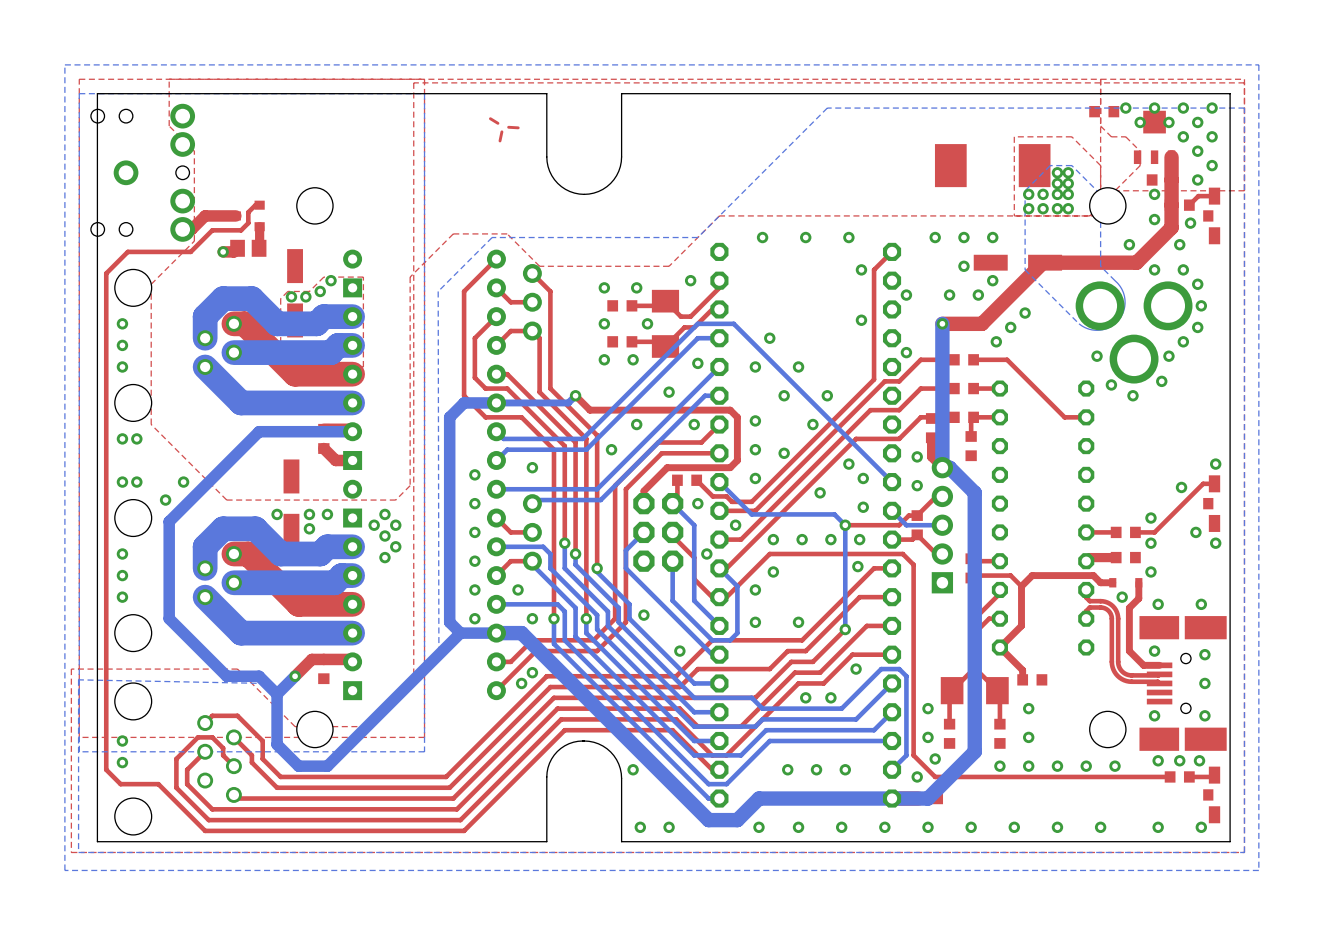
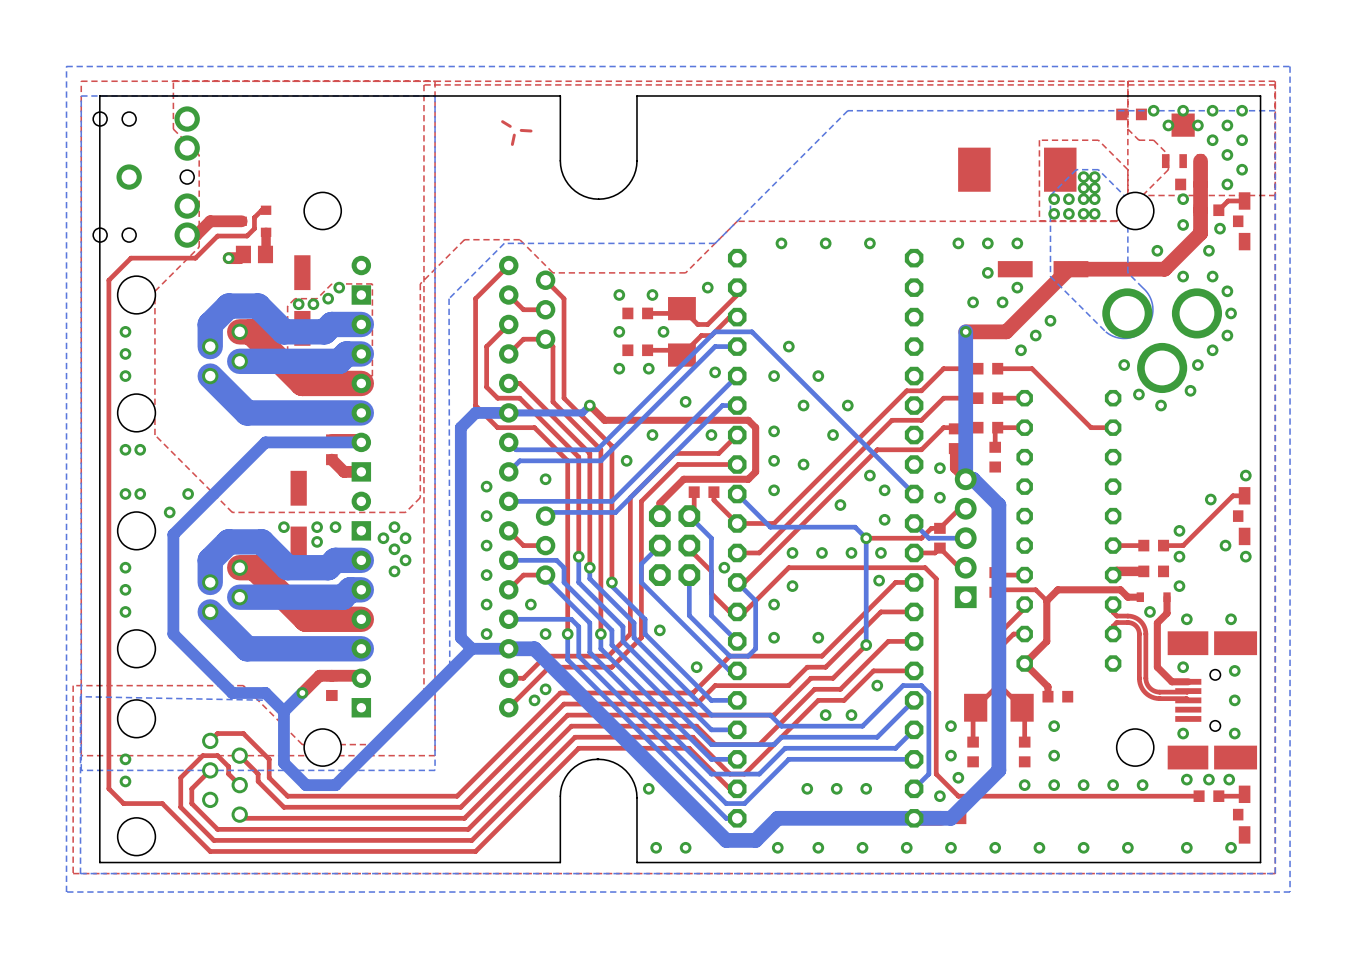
top track: (892, 251) (874, 269) (874, 379) (751, 501) (732, 501) (726, 496) (712, 496) (696, 480) -> (737, 523) (713, 500) (713, 492)
via: (861, 269) -> none
via: (906, 295) -> none
via: (861, 320) -> none
via: (906, 352) -> none
via: (697, 503) -> none
via: (735, 525) -> none

